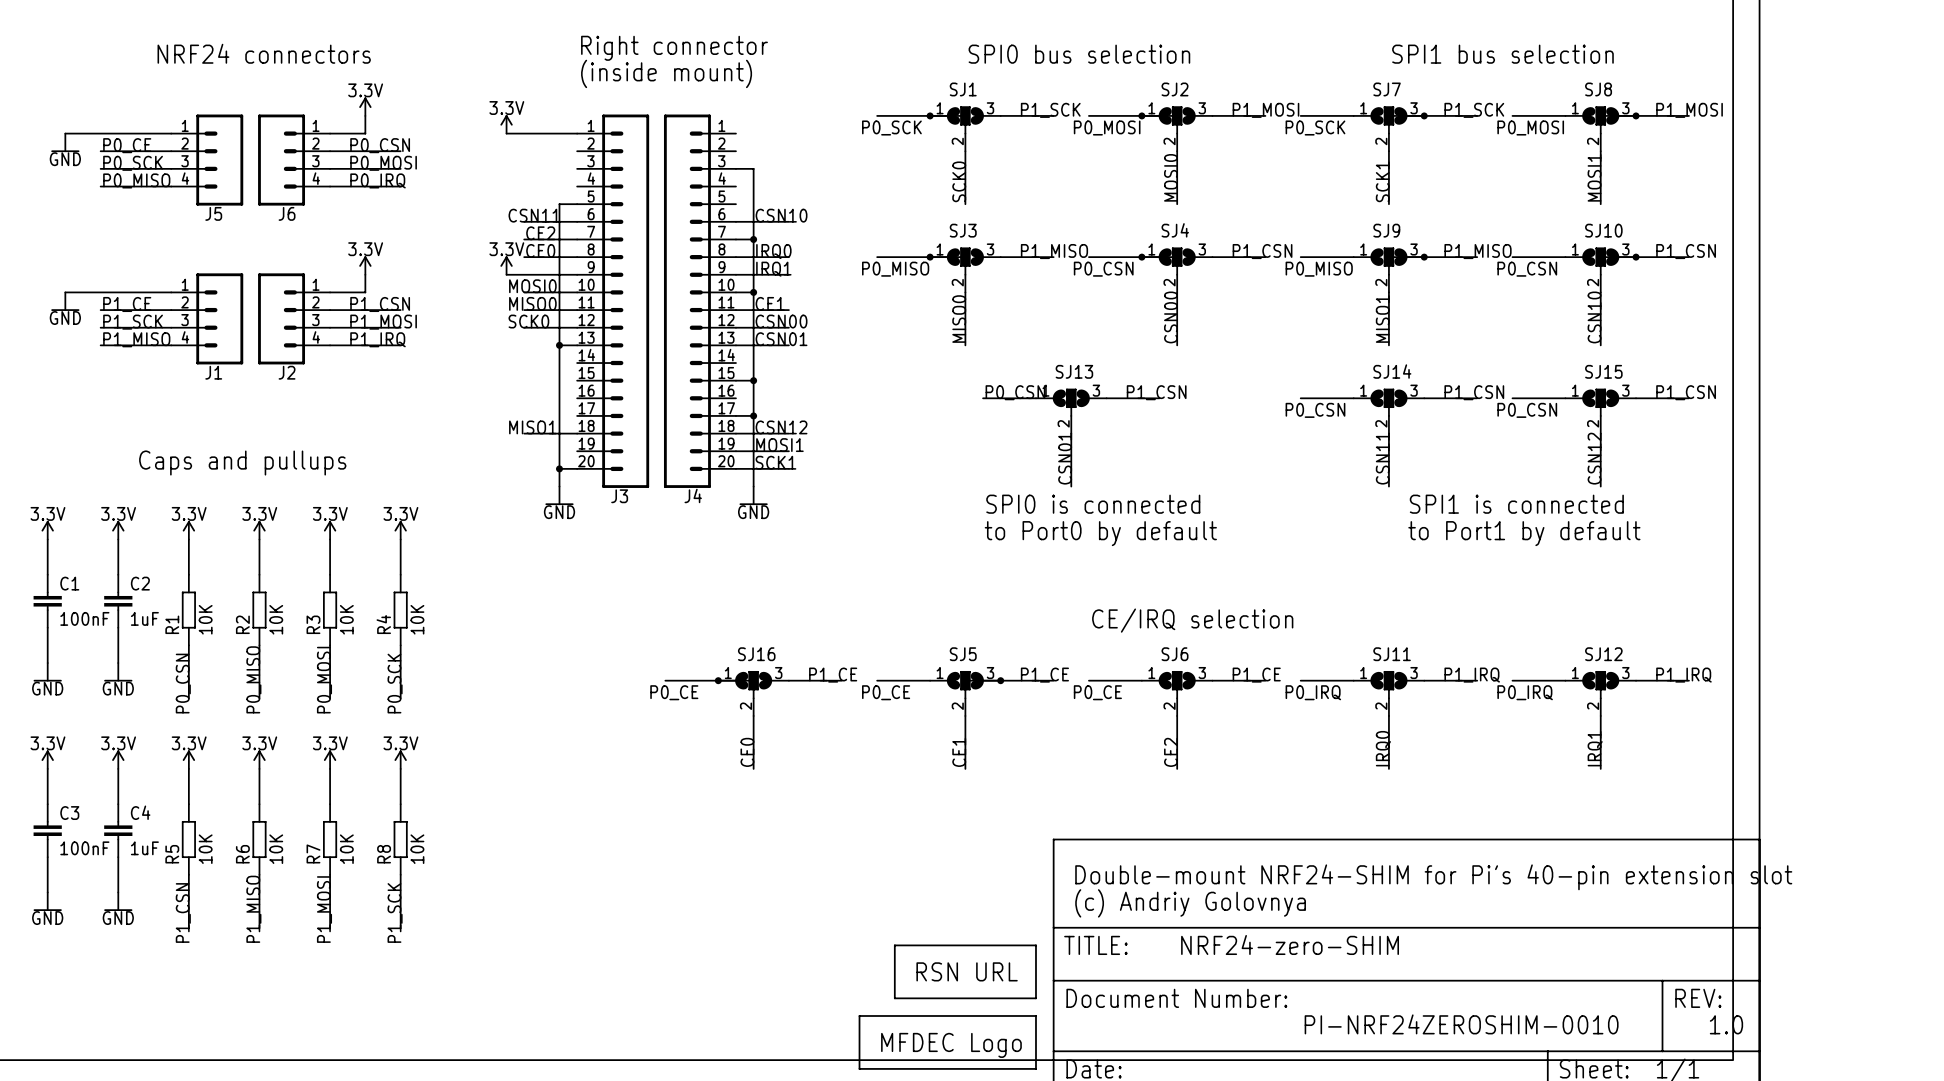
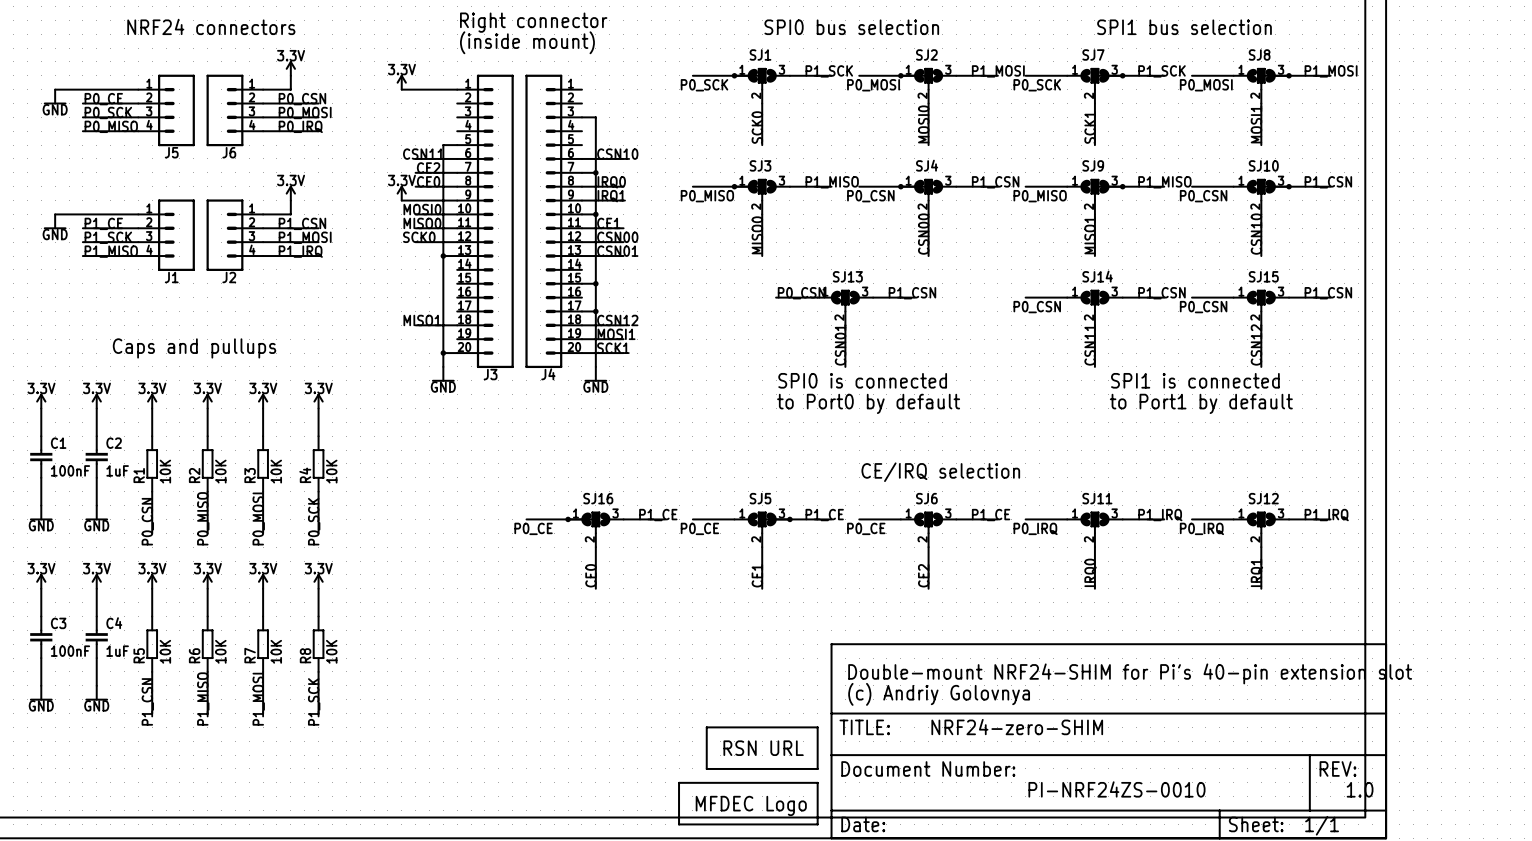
text: PI-NRF24ZEROSHIM-0010 (1461, 1024) -> PI-NRF24ZS-0010 (1116, 789)

